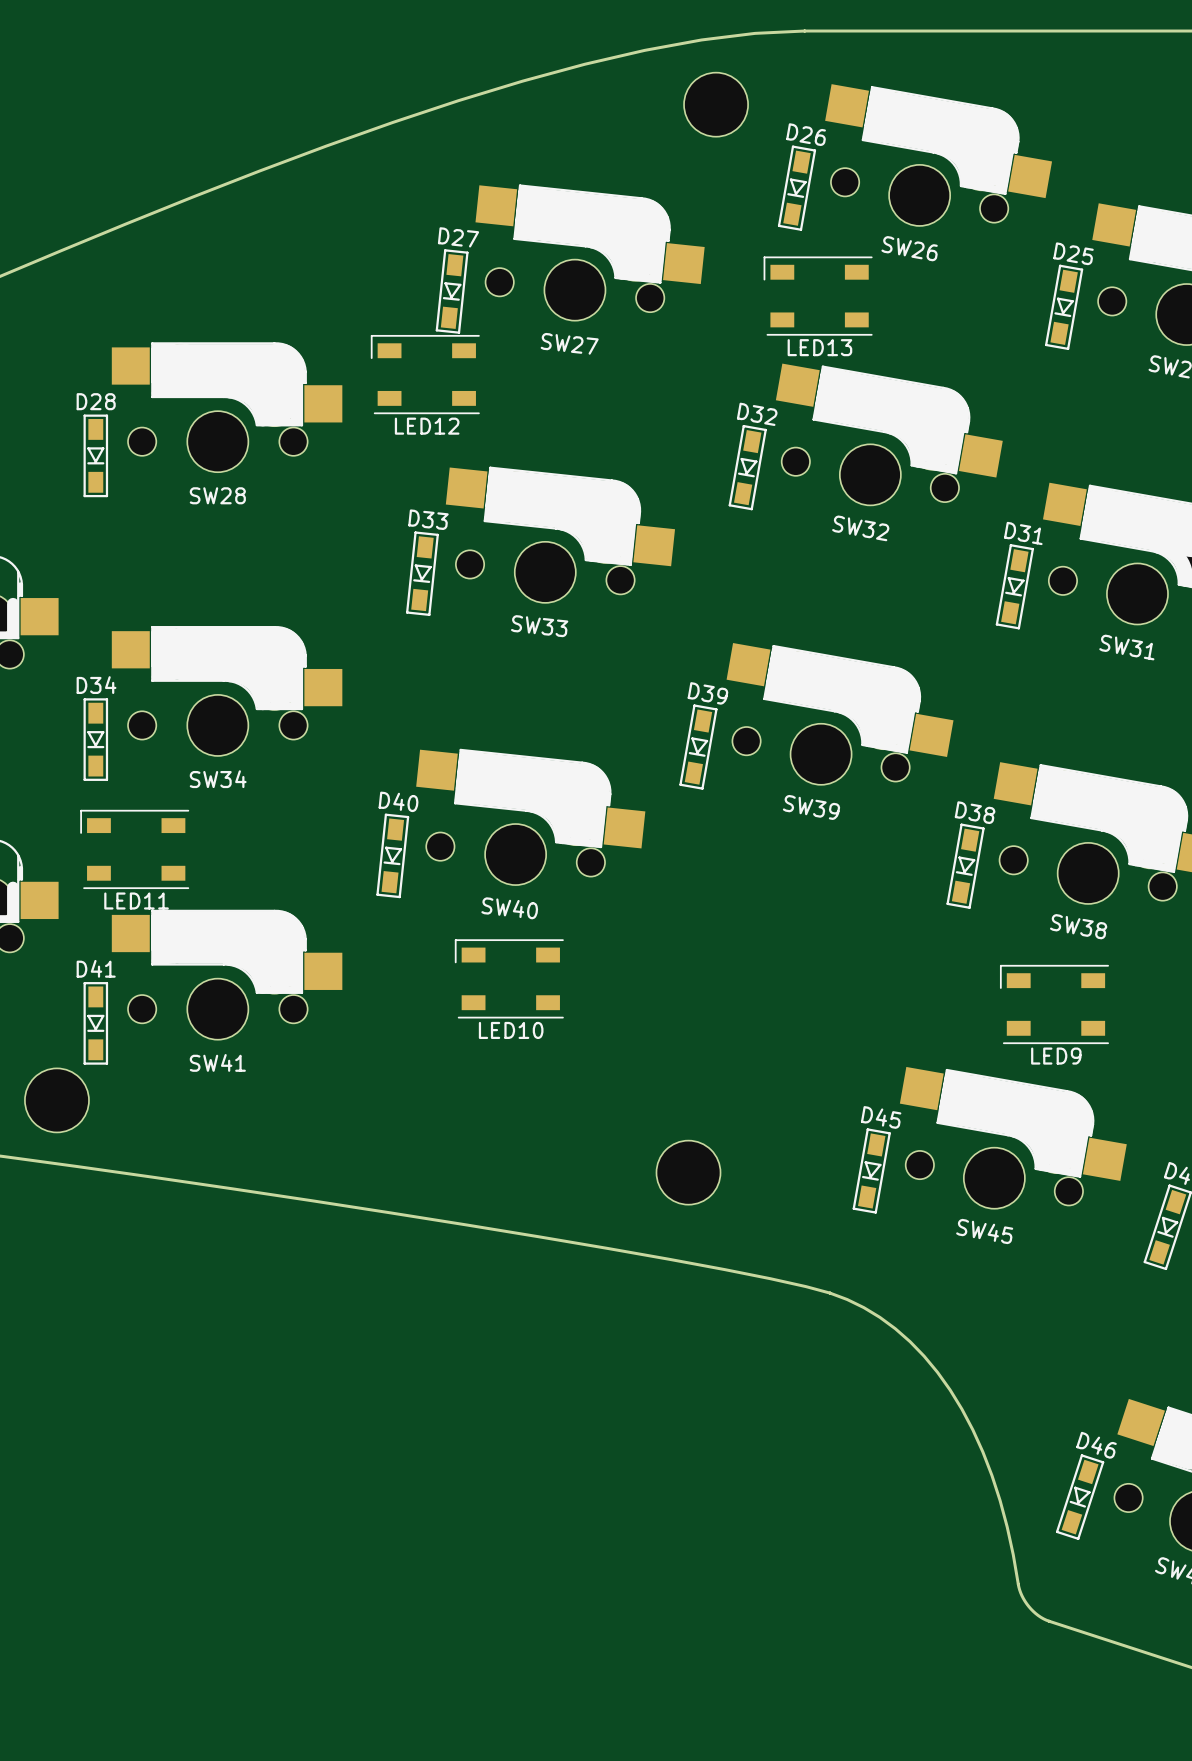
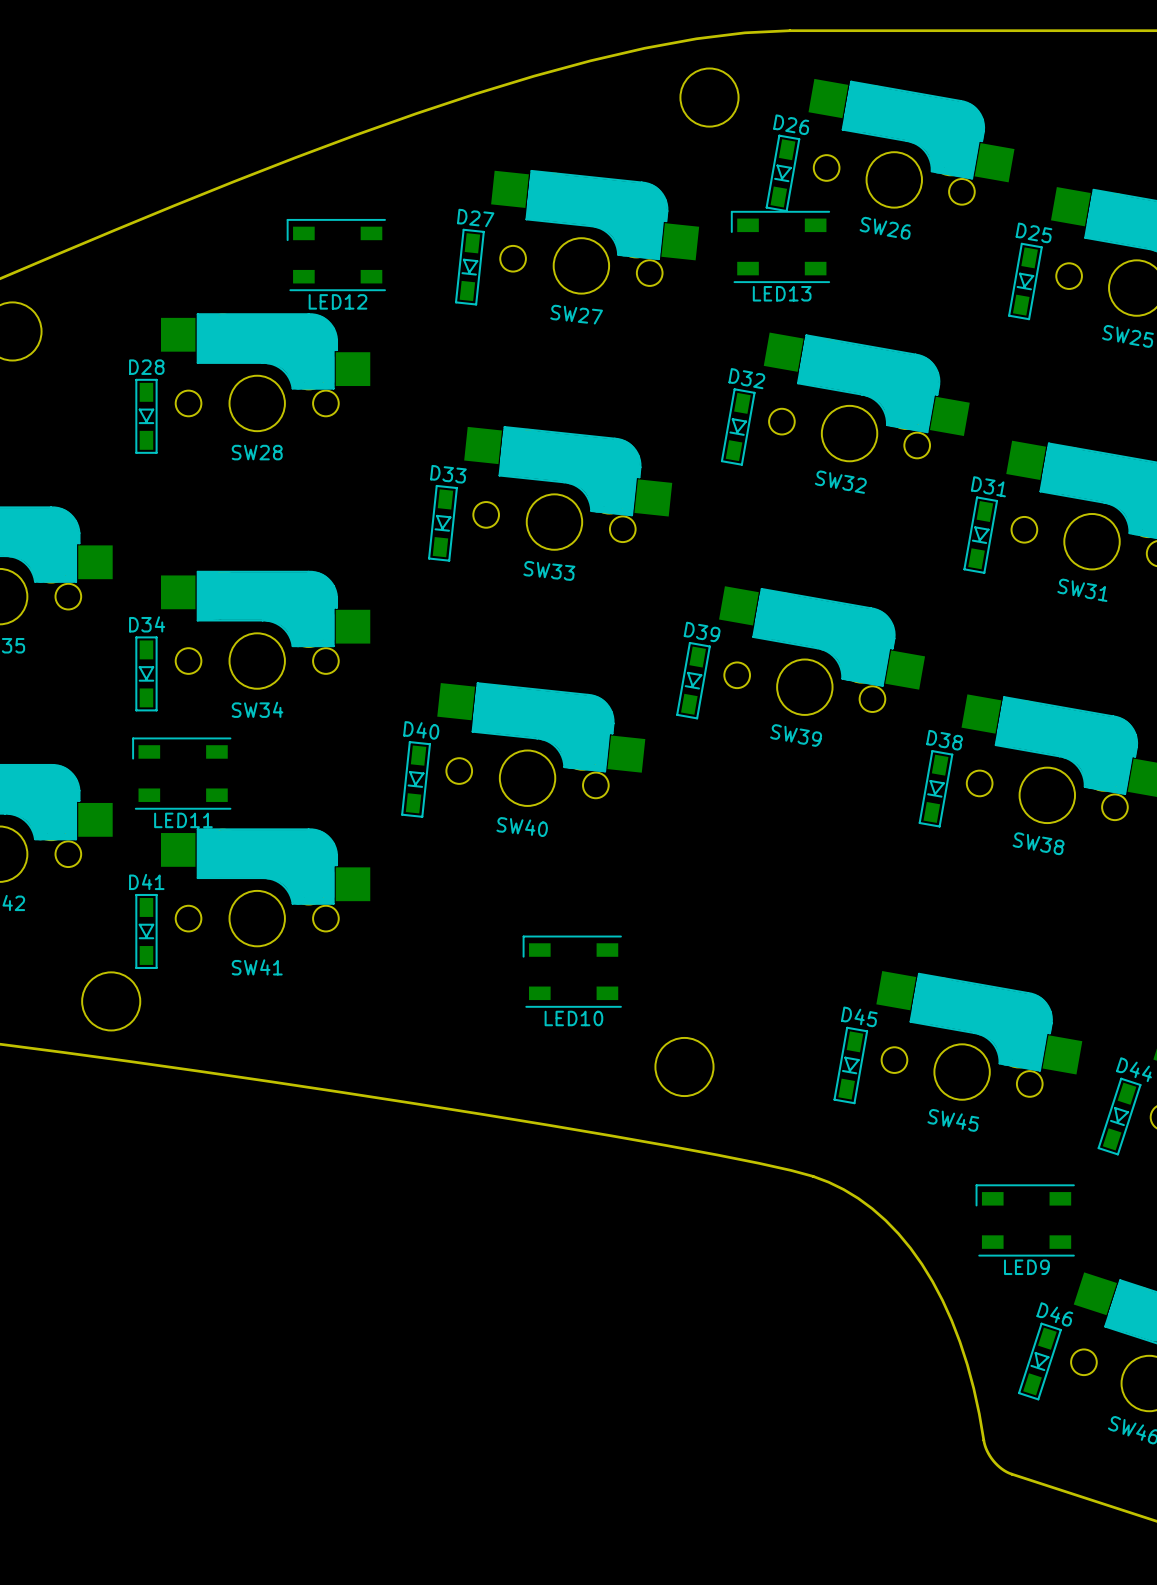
LED13 position: (818, 296) -> (780, 246)
LED12 position: (425, 374) -> (336, 255)
LED10 position: (509, 978) -> (572, 971)
LED9 position: (1054, 1004) -> (1025, 1220)

